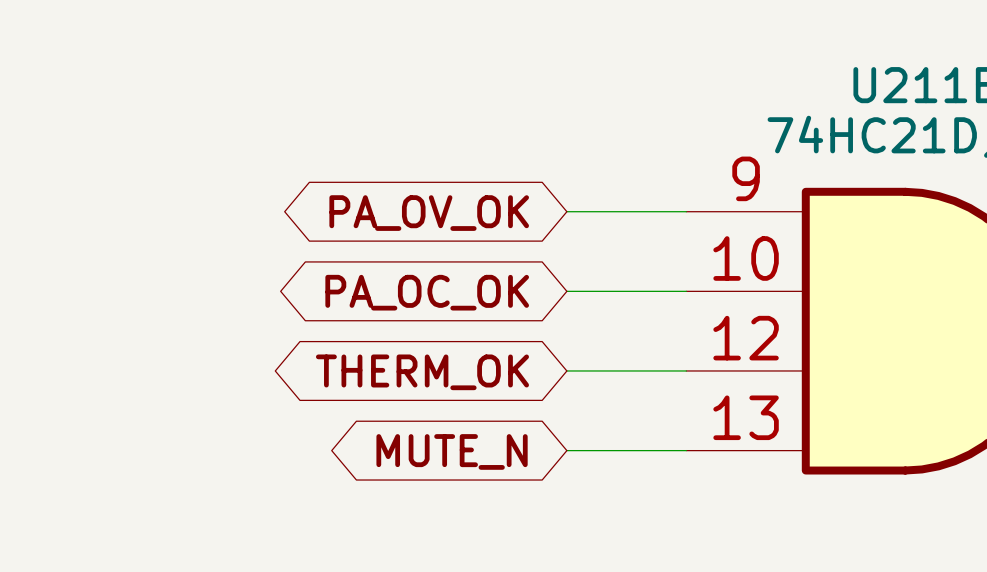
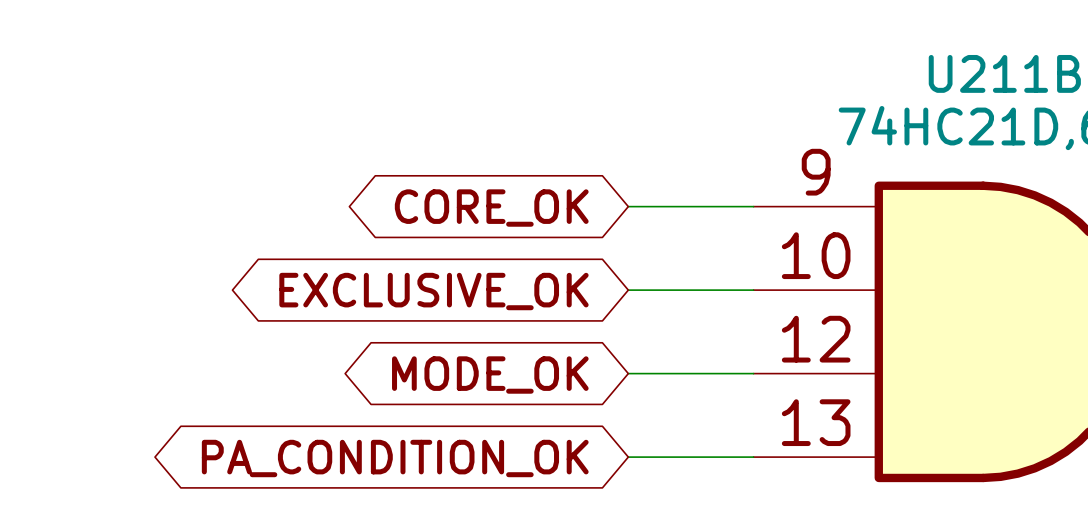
global label: PA_OV_OK (429, 213) -> CORE_OK (491, 208)
global label: PA_OC_OK (427, 292) -> EXCLUSIVE_OK (433, 291)
global label: THERM_OK (422, 372) -> MODE_OK (490, 375)
global label: MUTE_N (452, 451) -> PA_CONDITION_OK (395, 458)

